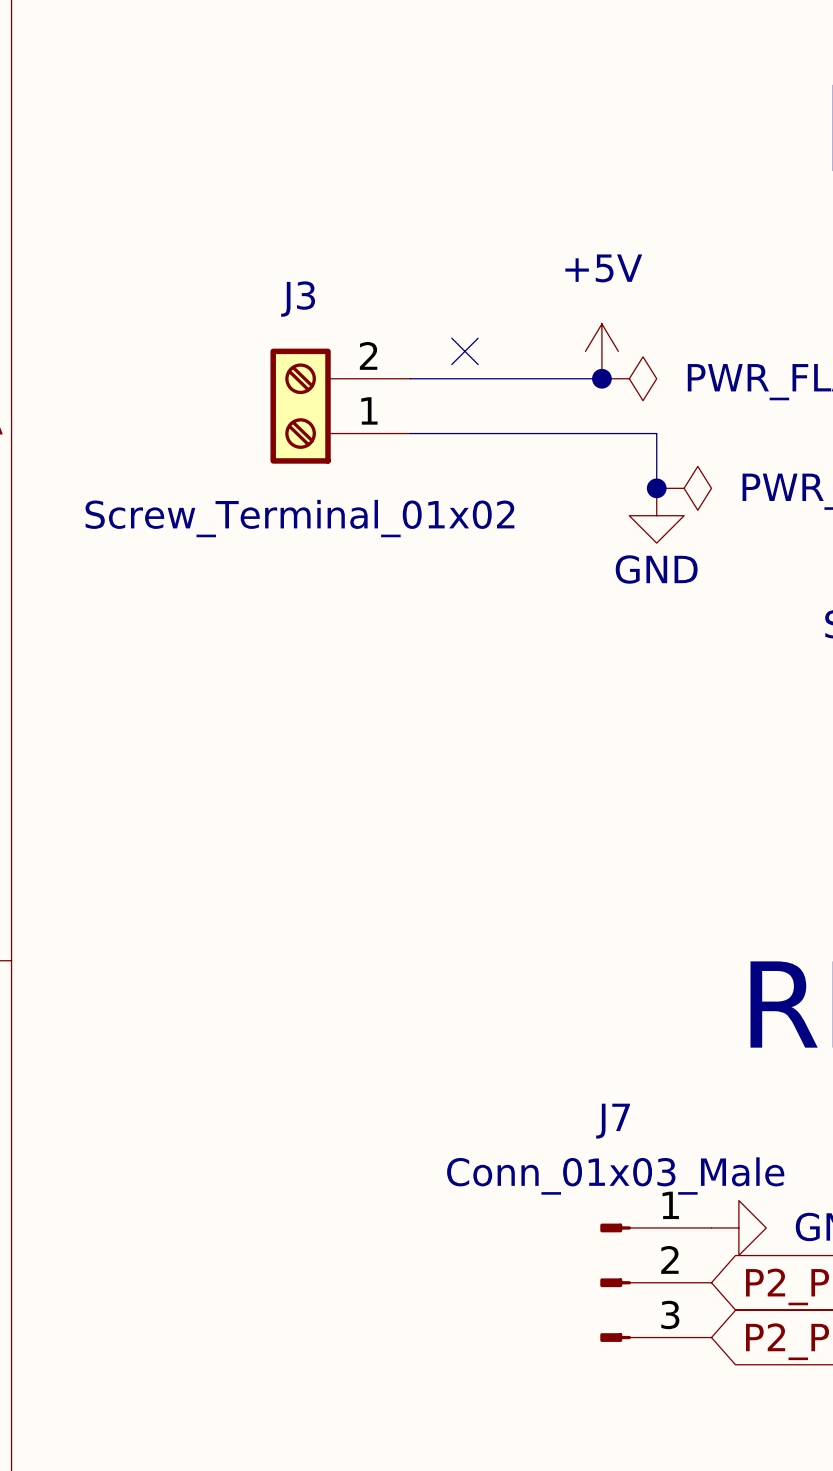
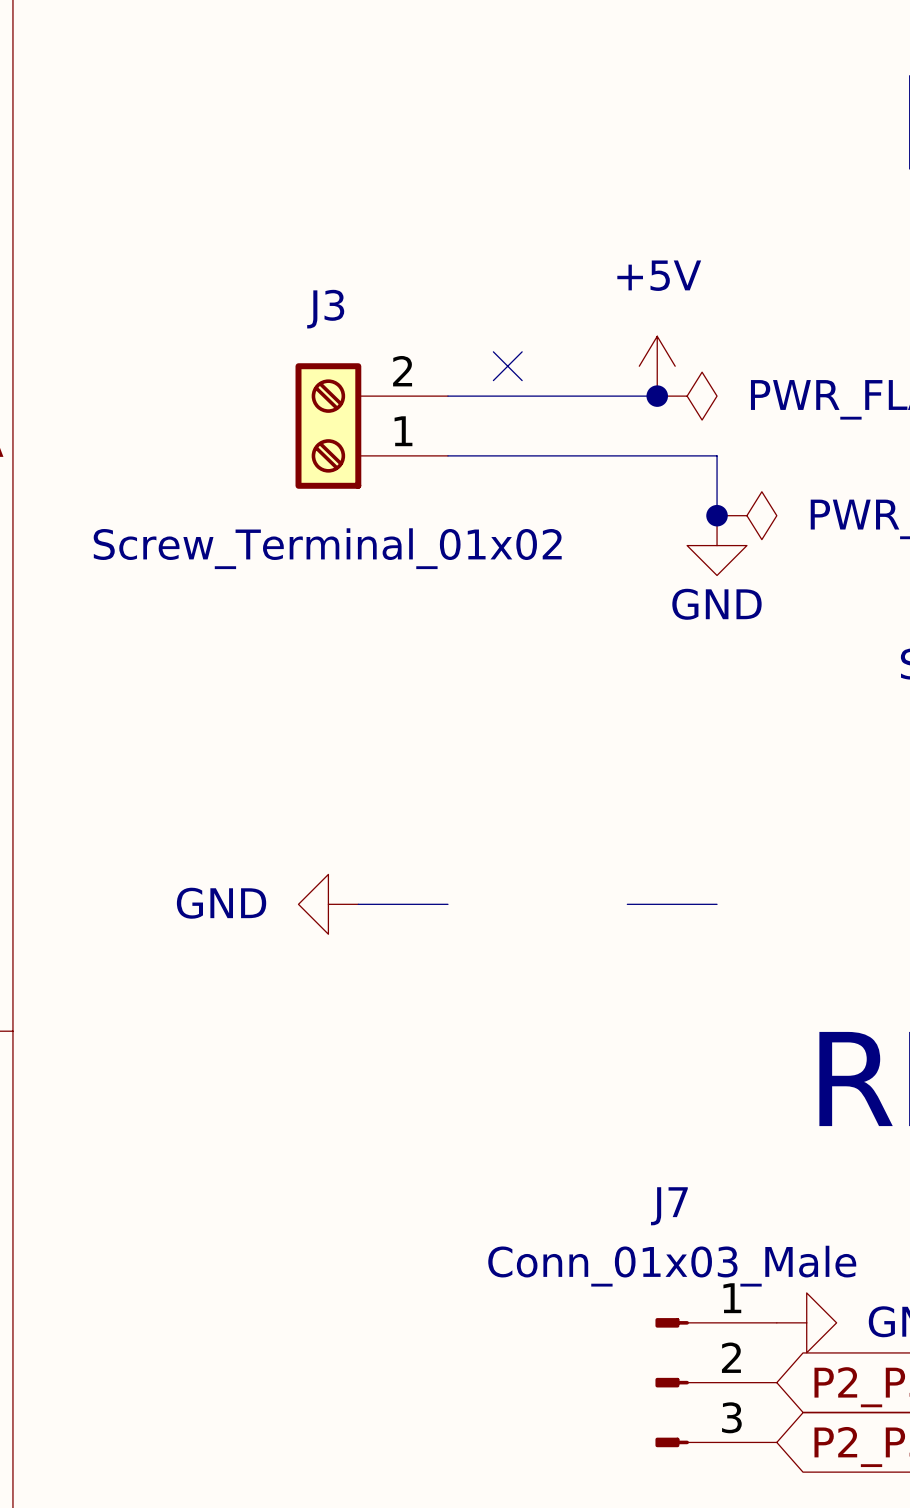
power symbol: none -> GND (328, 904)
wire: none -> (358, 904) (447, 904)
wire: none -> (627, 904) (717, 904)

